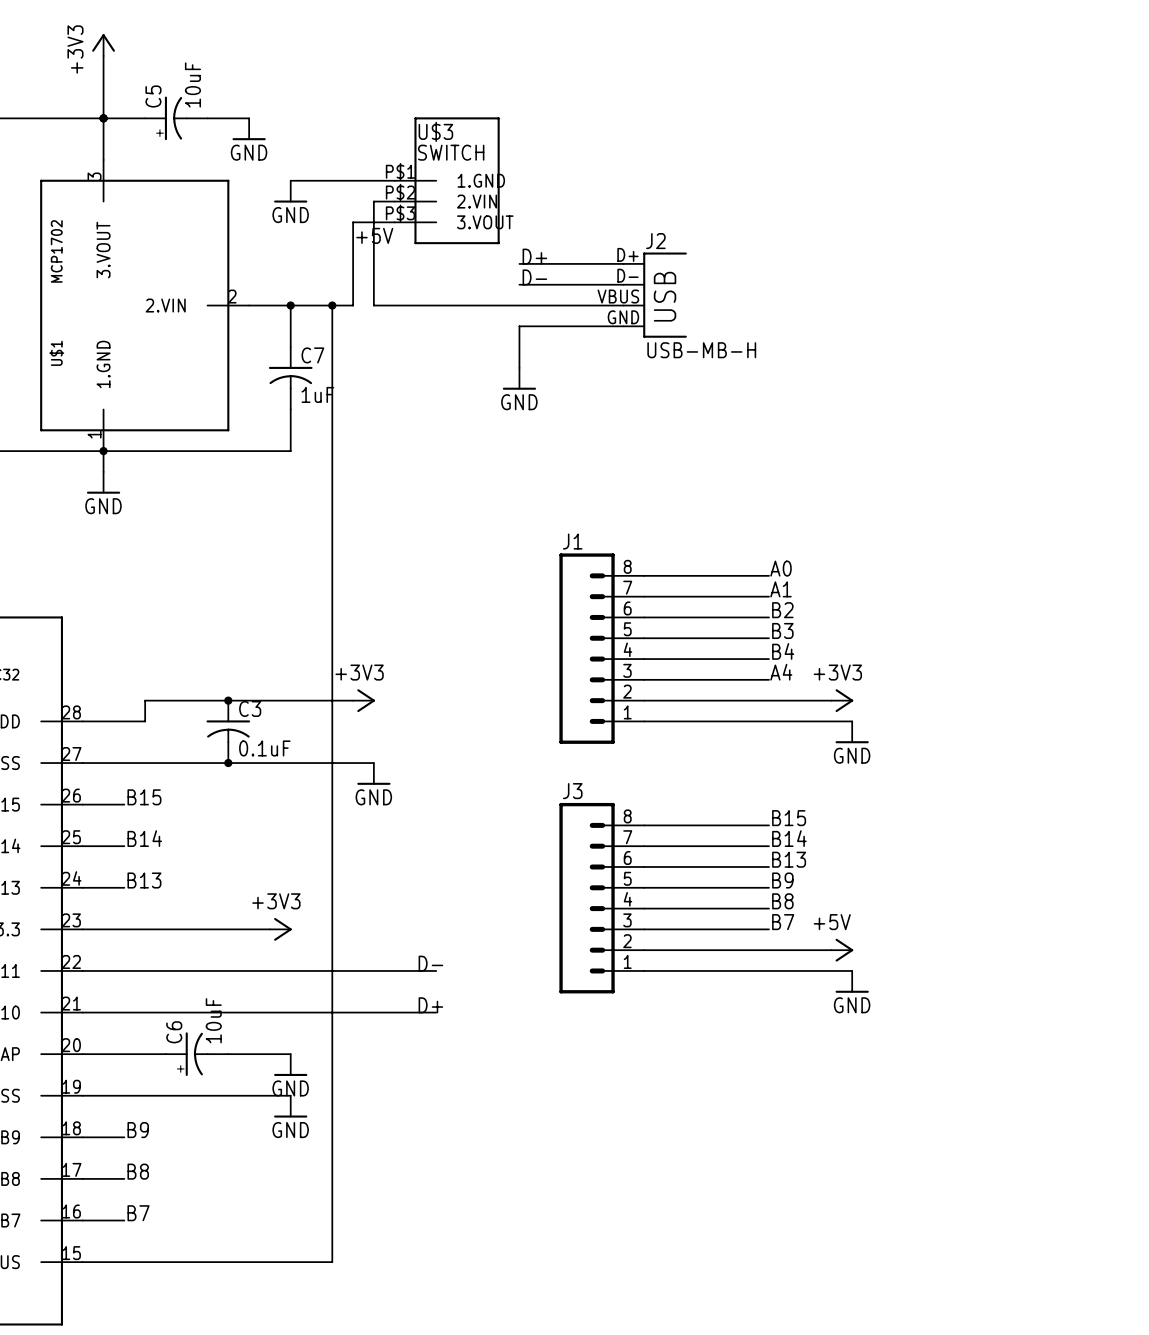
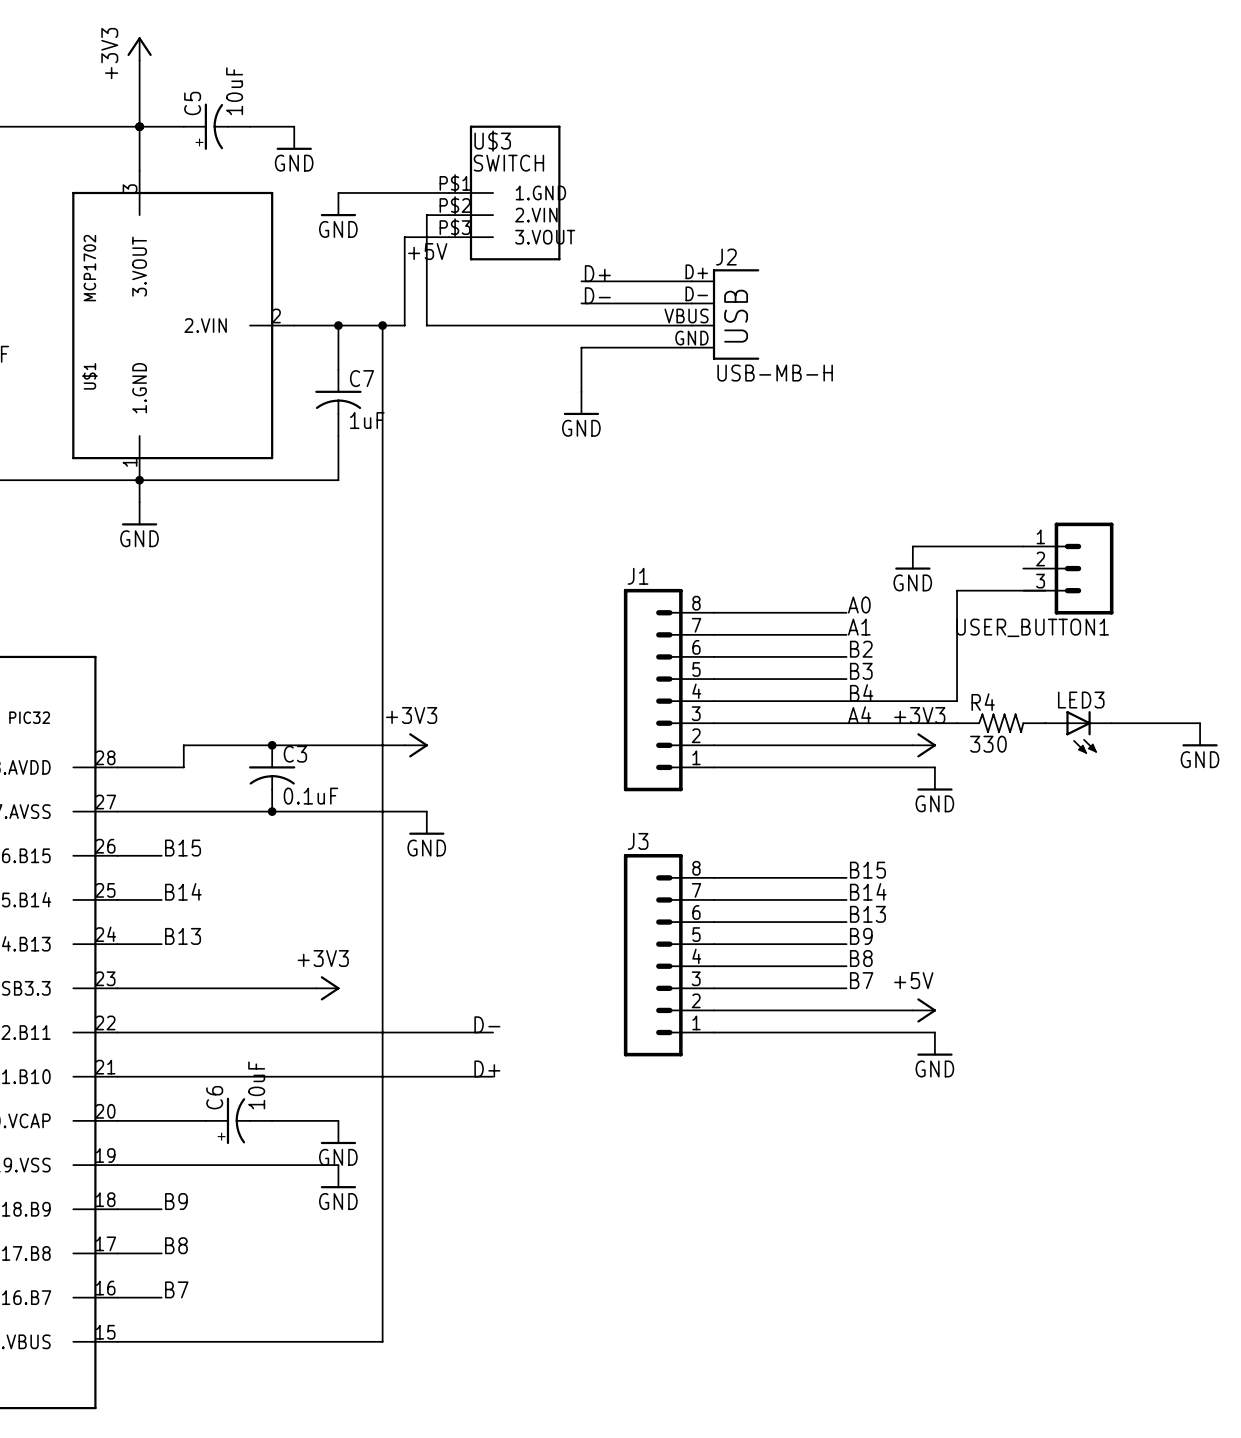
wire: none -> (912, 546) (1023, 546)
power symbol: none -> GND (912, 558)
USER_BUTTON1: none -> (1068, 568)
wire: none -> (1045, 590) (957, 590) (957, 701) (846, 701)
wire: none -> (846, 723) (957, 723)
R4: none -> 330 (1001, 723)
wire: none -> (1111, 723) (1200, 723)
LED3: none -> (1078, 732)
power symbol: none -> GND (1200, 734)

